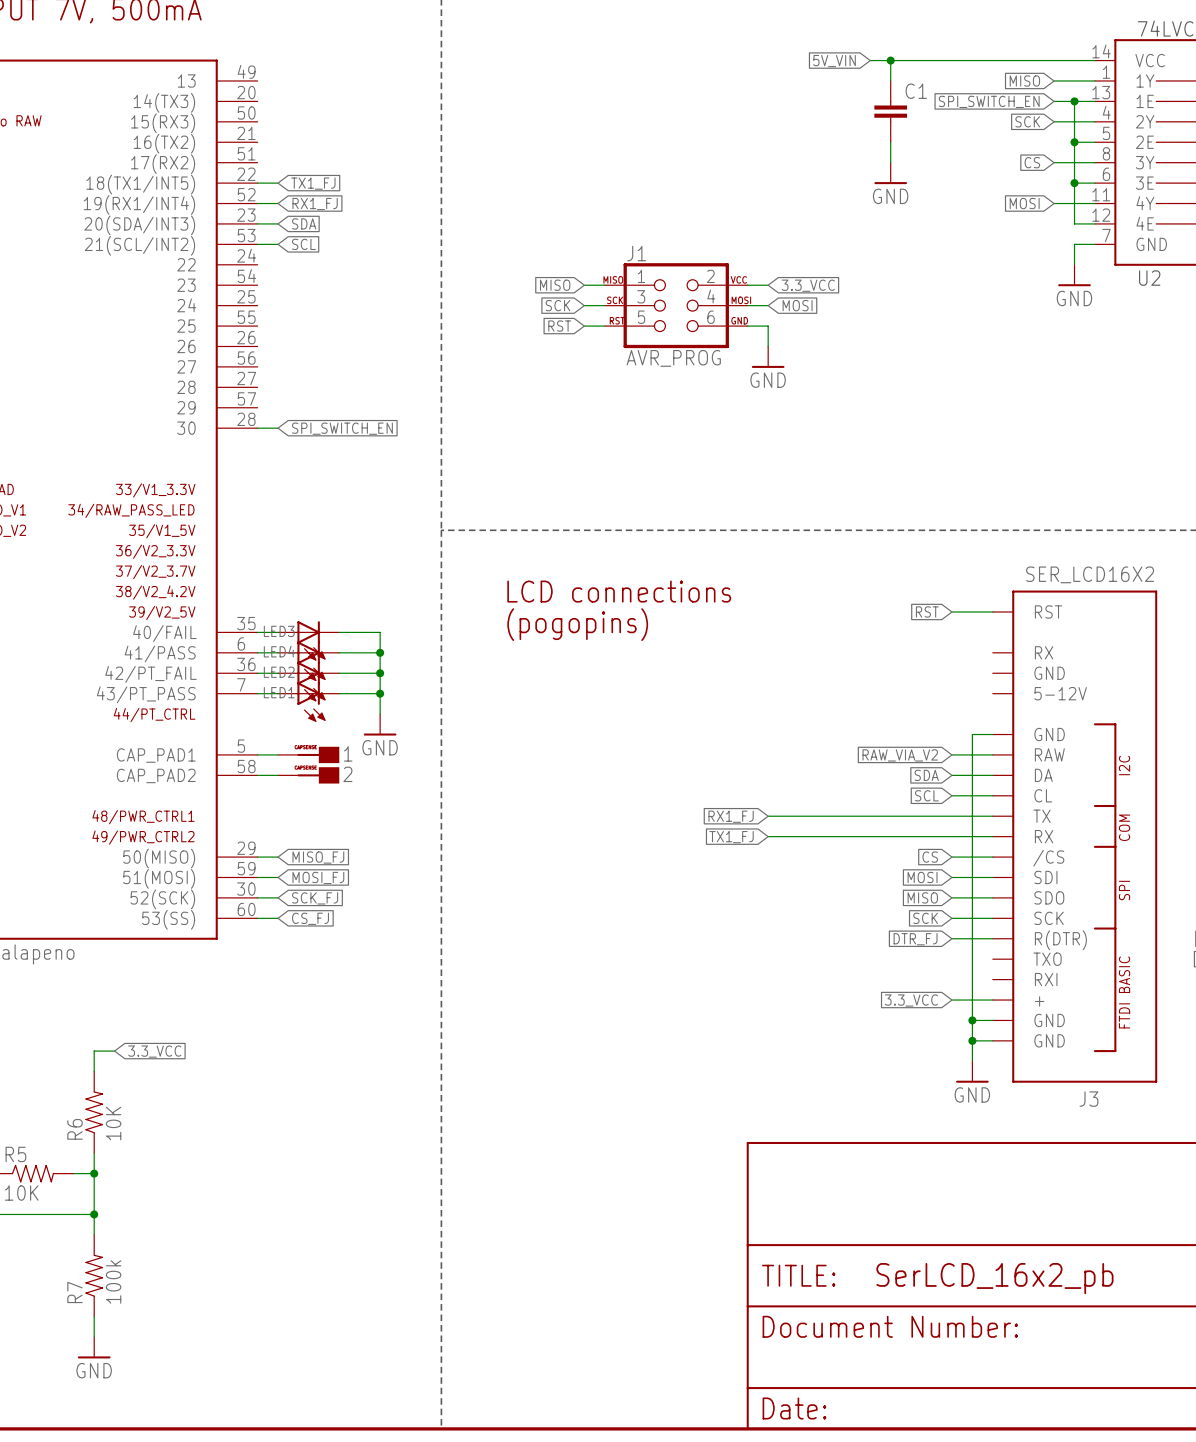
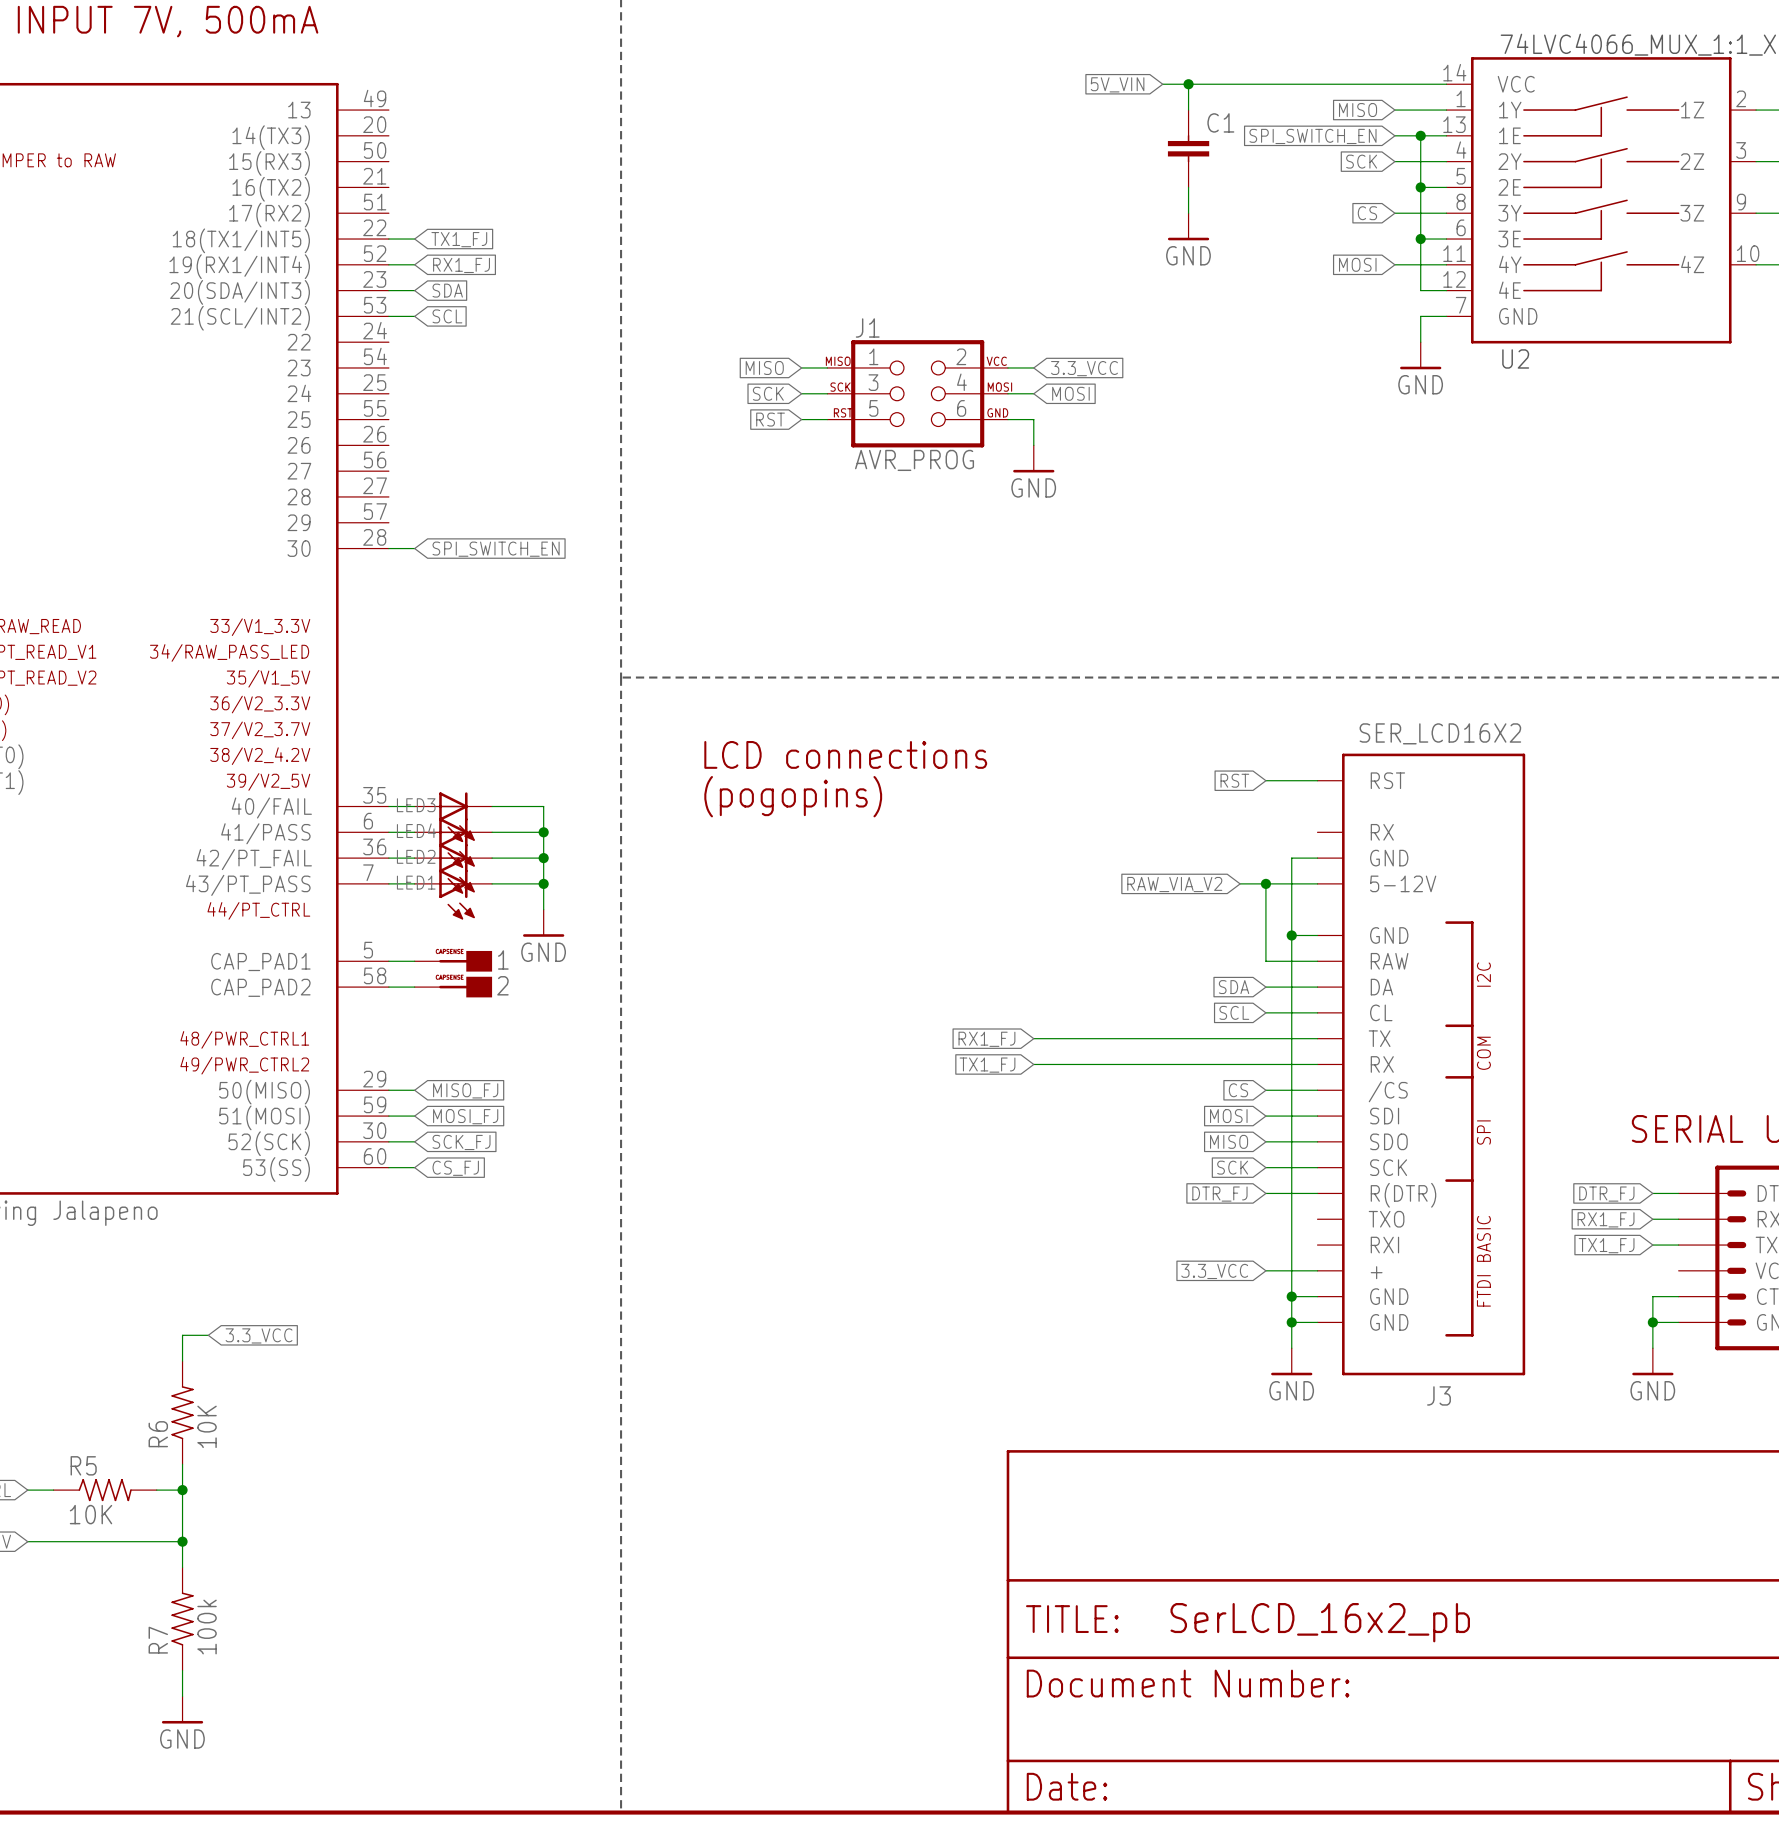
wire: none -> (1317, 858) (1291, 858) (1291, 935)
wire: none -> (1240, 883) (1317, 883)
wire: none -> (1265, 883) (1265, 961)
junction: none -> (1265, 883)
junction: none -> (1291, 935)
global label position: RAW_VIA_V2 (900, 755) -> RAW_VIA_V2 (1174, 884)

